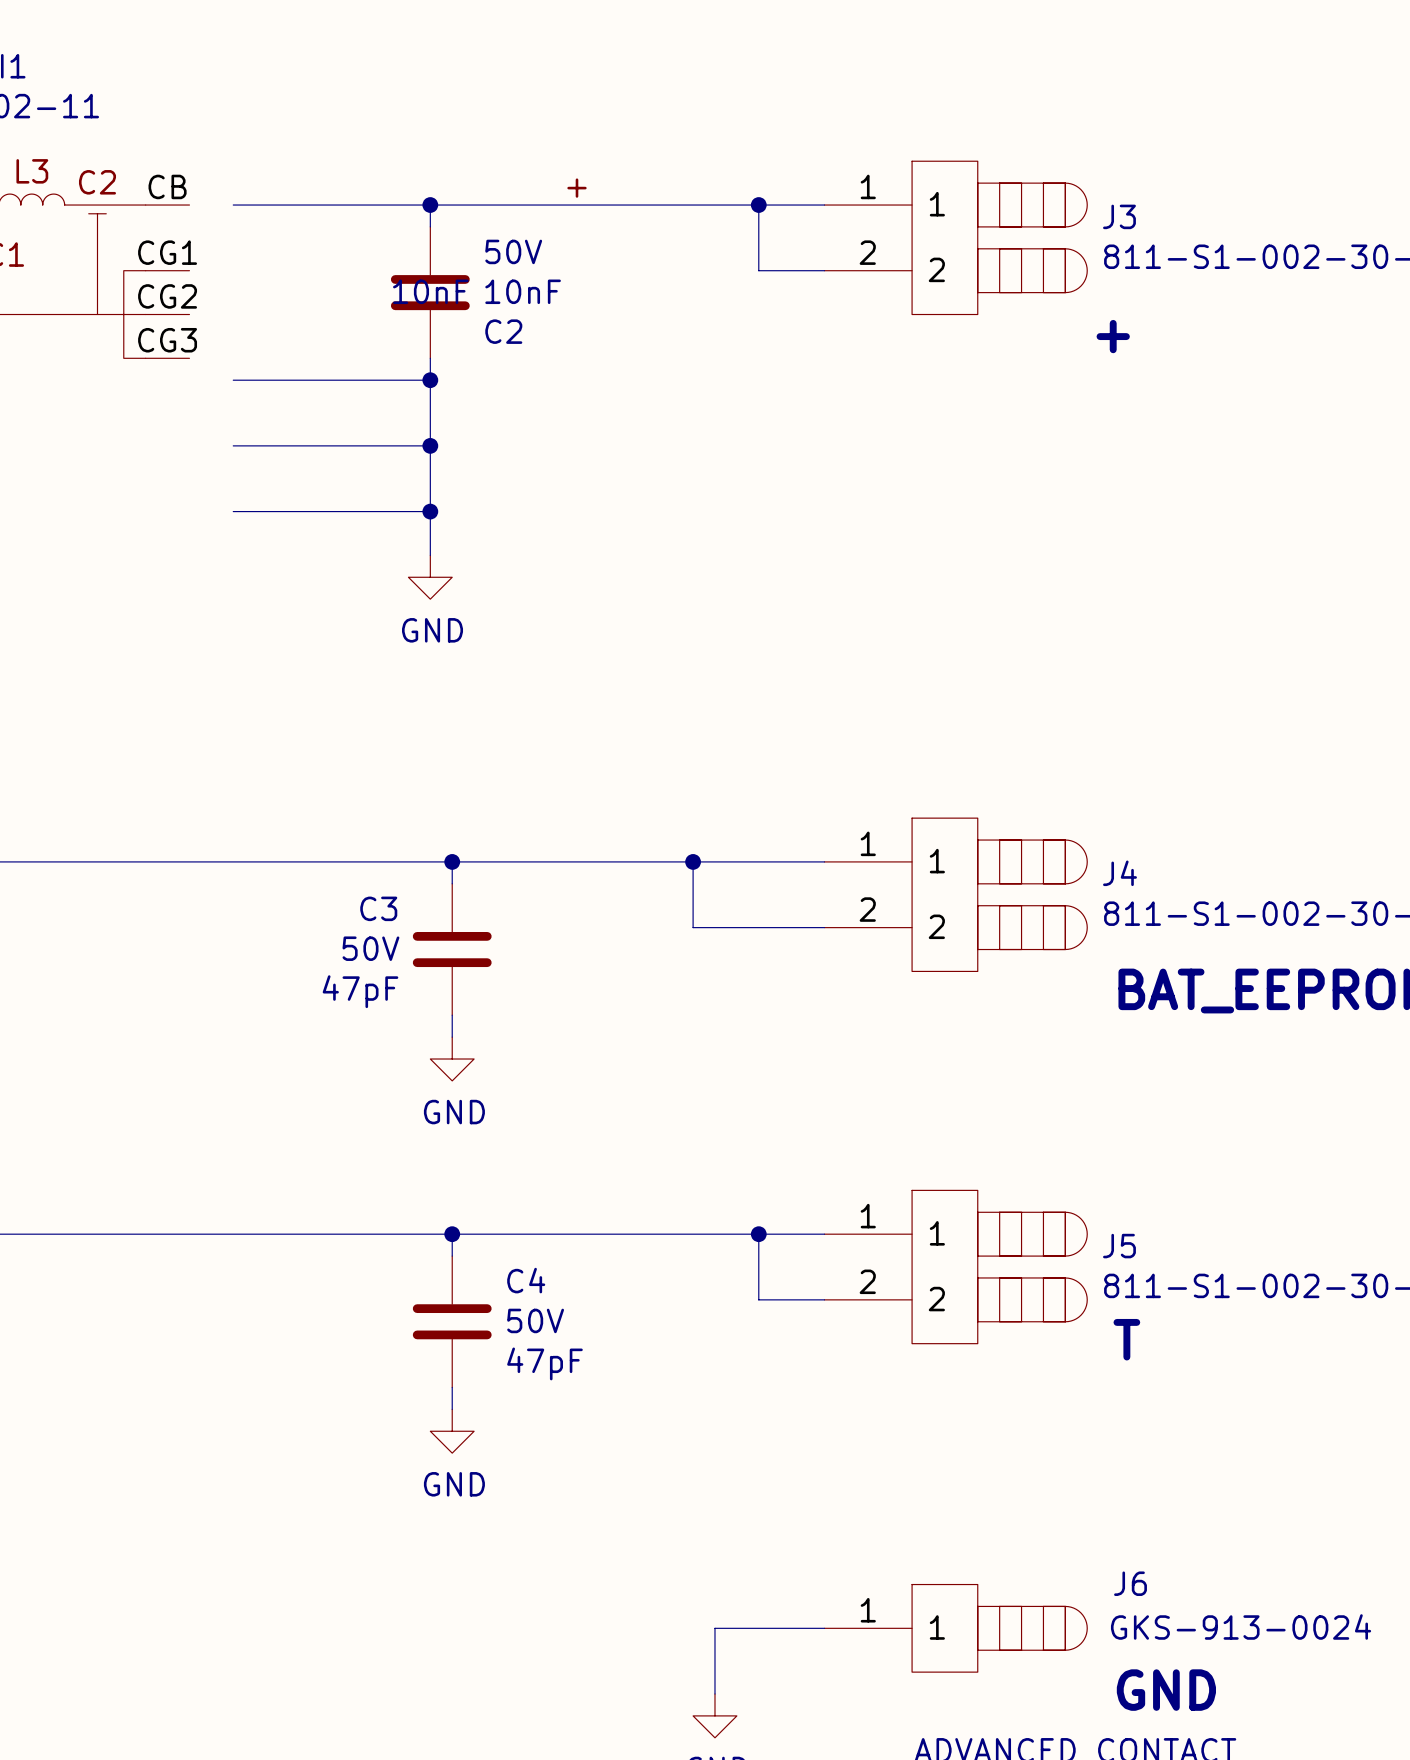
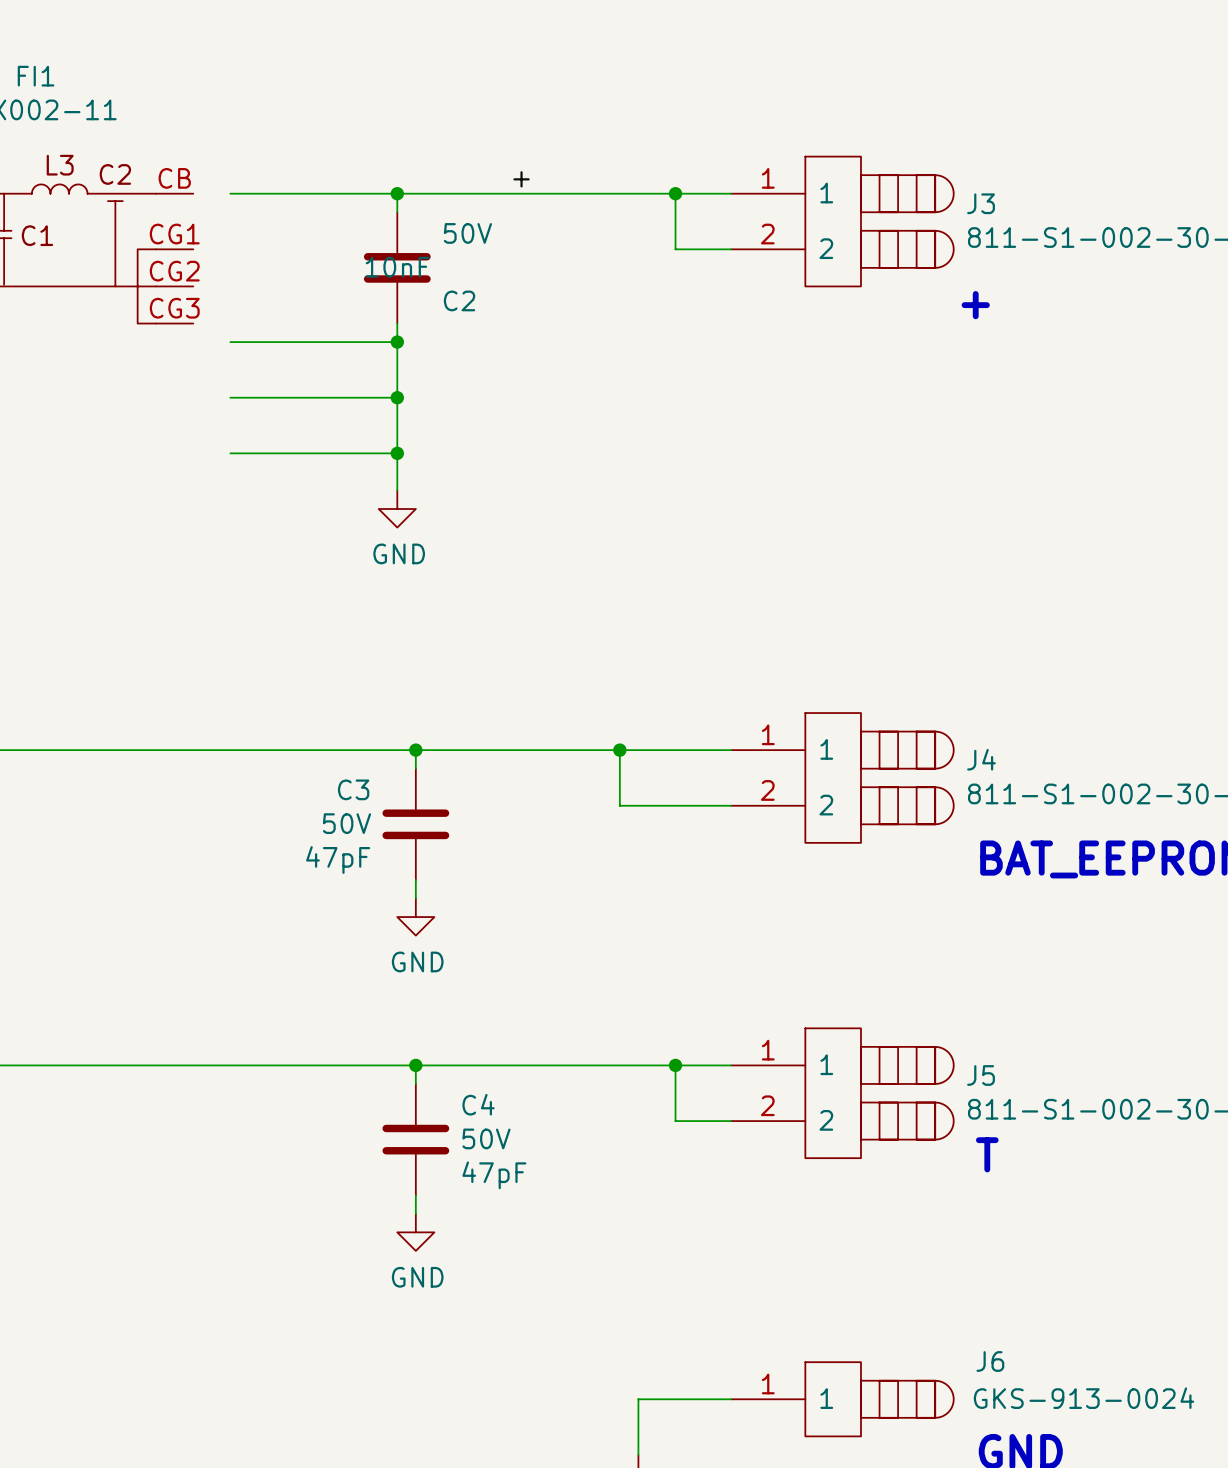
C2 value: 10nF (523, 291) -> none

